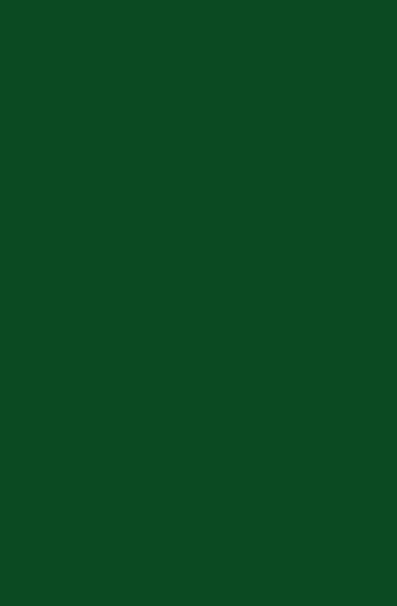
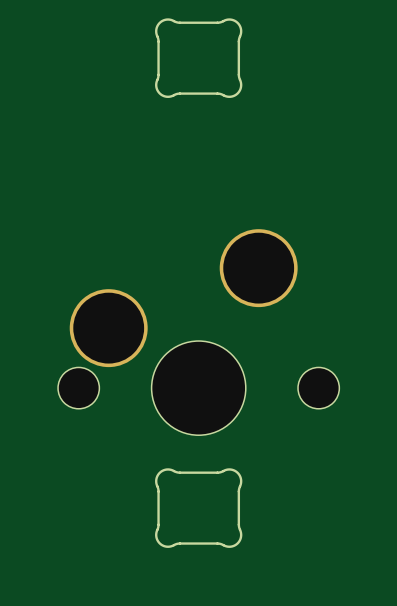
part: none -> (198, 58)
part: none -> (198, 332)
part: none -> (198, 508)

